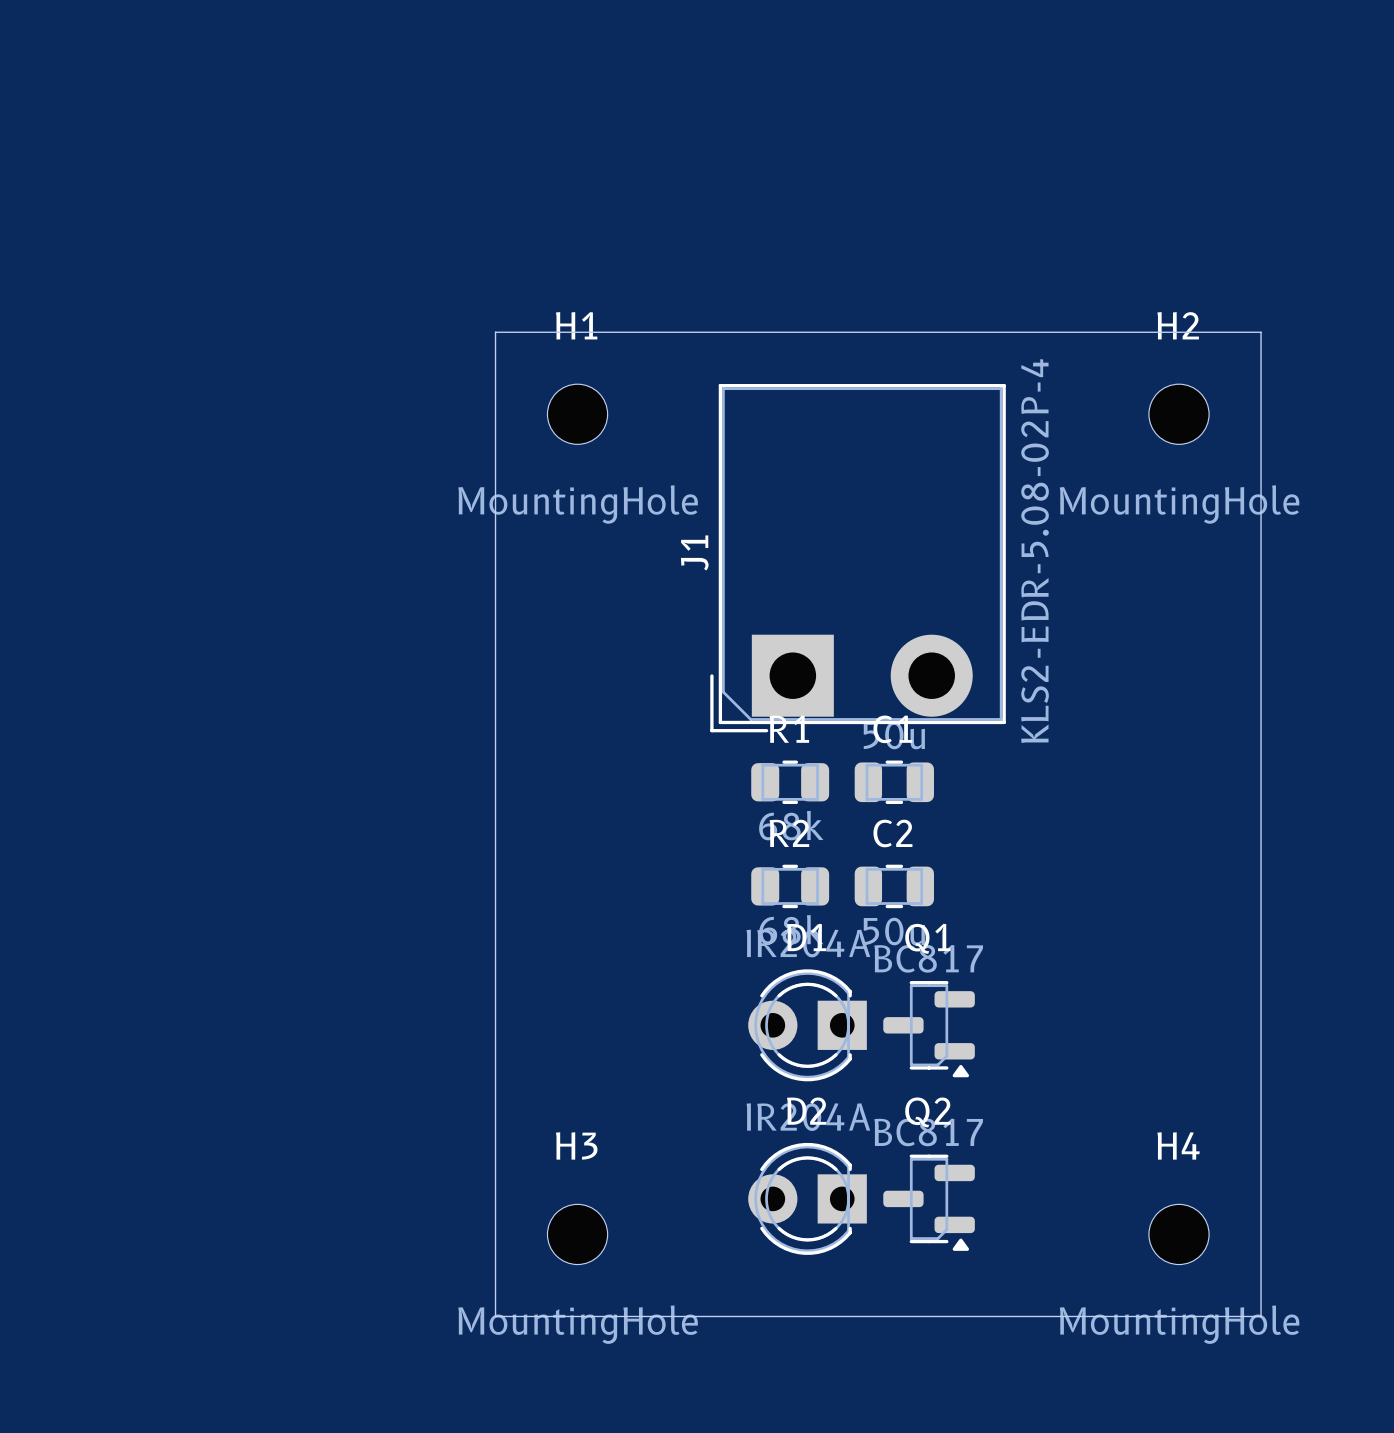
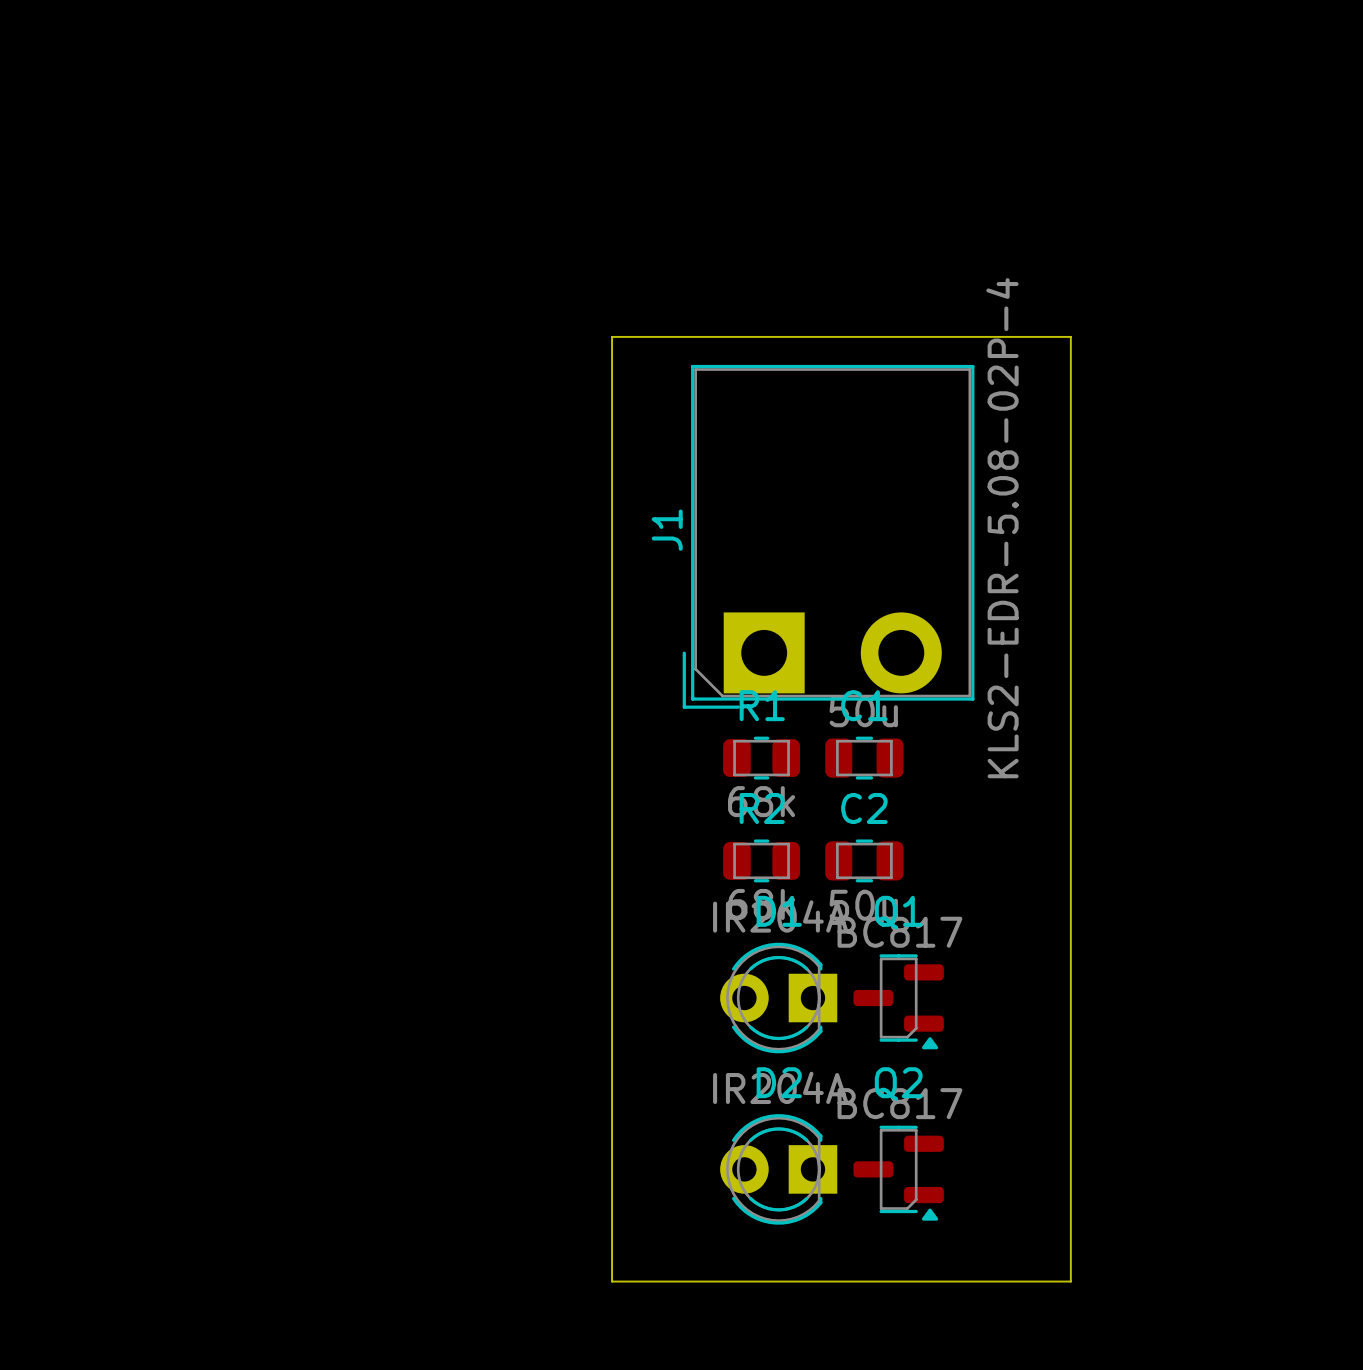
board edge: (495, 332) (1261, 332) (1261, 1316) (495, 1316) (495, 332) -> (612, 336) (612, 1281) (1070, 1281) (1070, 336) (612, 336)
H1: MountingHole (577, 414) -> none
H2: MountingHole (1179, 414) -> none
H3: MountingHole (577, 1234) -> none
H4: MountingHole (1179, 1234) -> none

